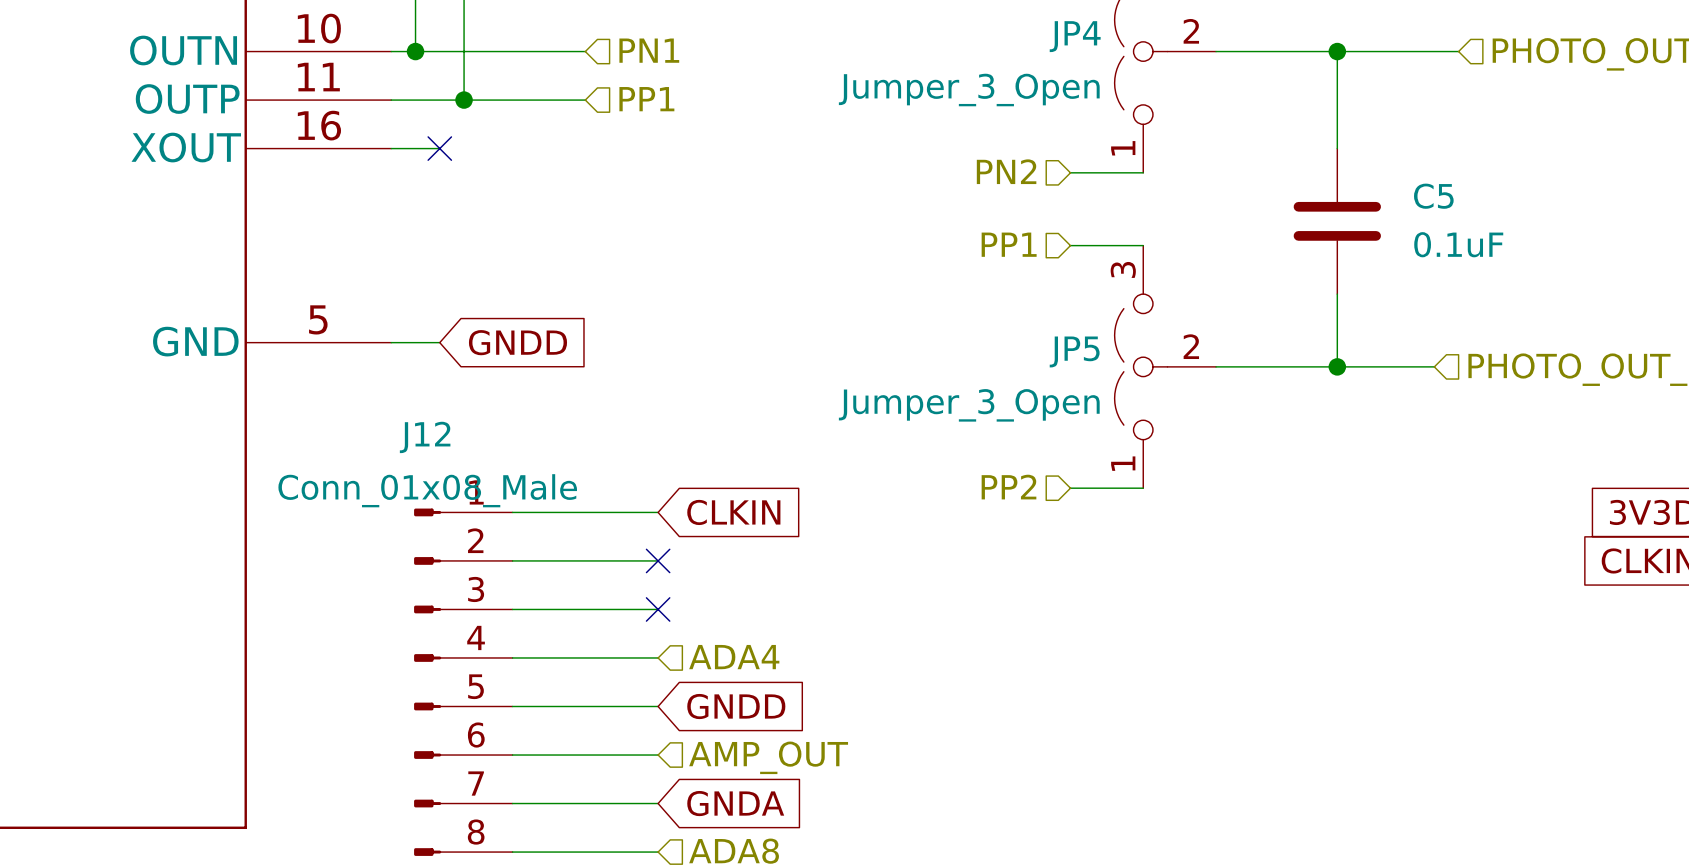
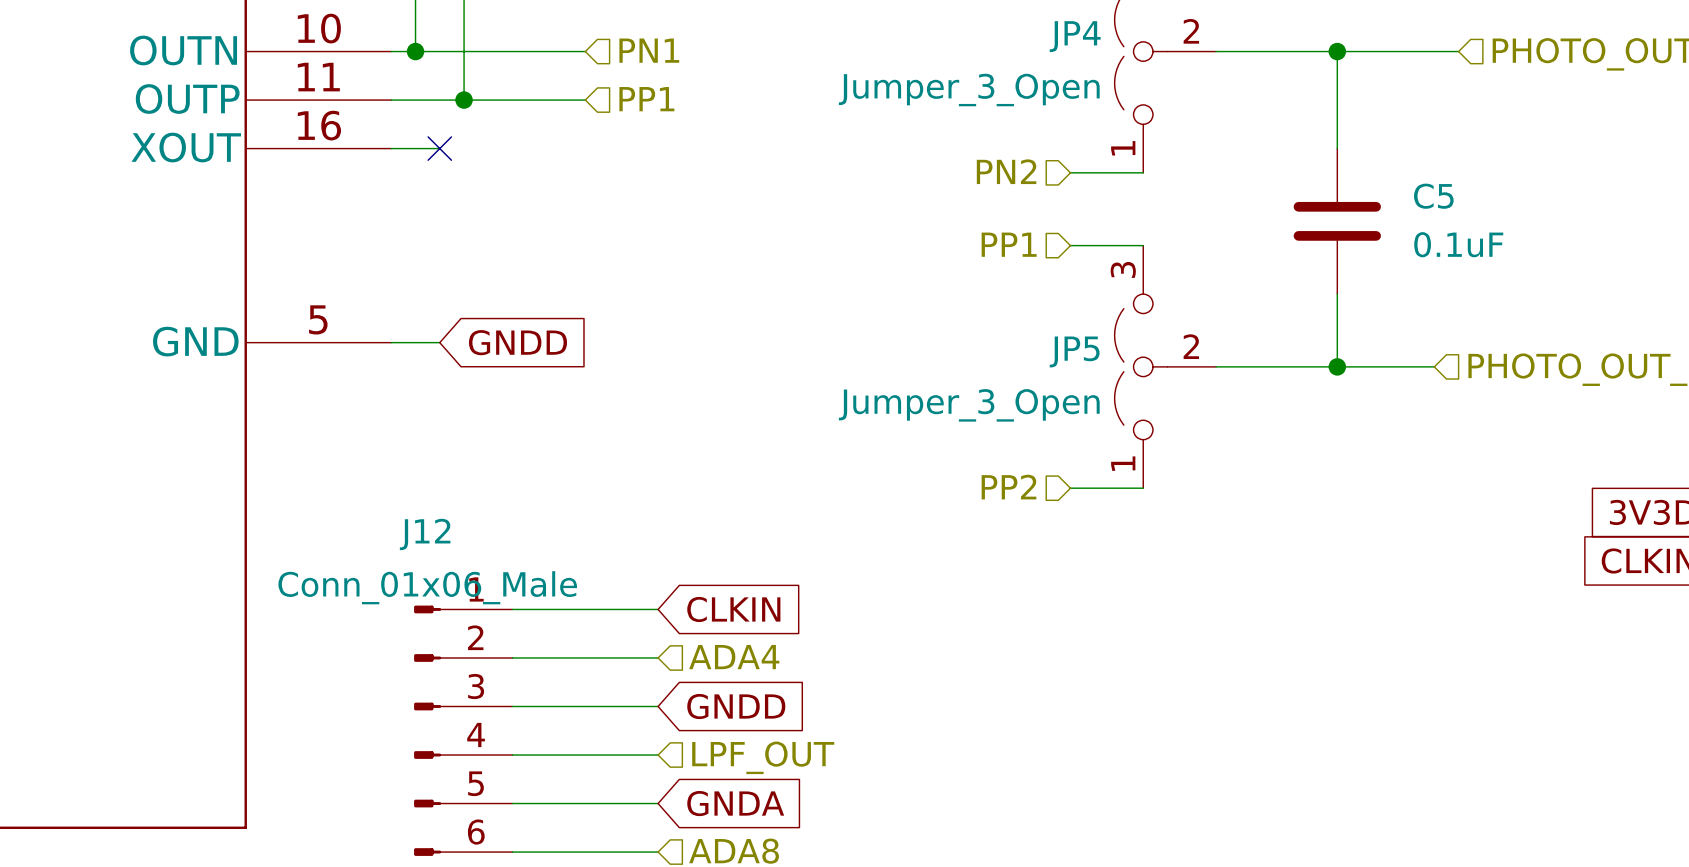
J12 name position: J12 (425, 437) -> J12 (425, 534)
J12 value: Conn_01x08_Male (427, 490) -> Conn_01x06_Male (427, 587)
J12 symbol: [414, 508, 513, 856] -> [414, 605, 513, 856]
wire: (512, 512) (658, 512) -> none
global label position: CLKIN (733, 512) -> CLKIN (733, 609)
wire: (512, 560) (658, 560) -> none
no-connect mark: (658, 560) -> none
no-connect mark: (658, 609) -> none
hierarchical label: AMP_OUT (768, 757) -> LPF_OUT (763, 757)

